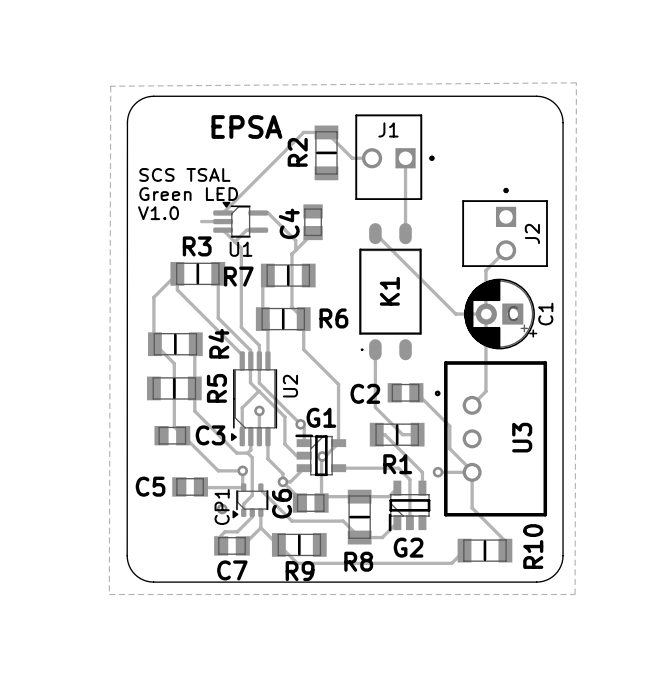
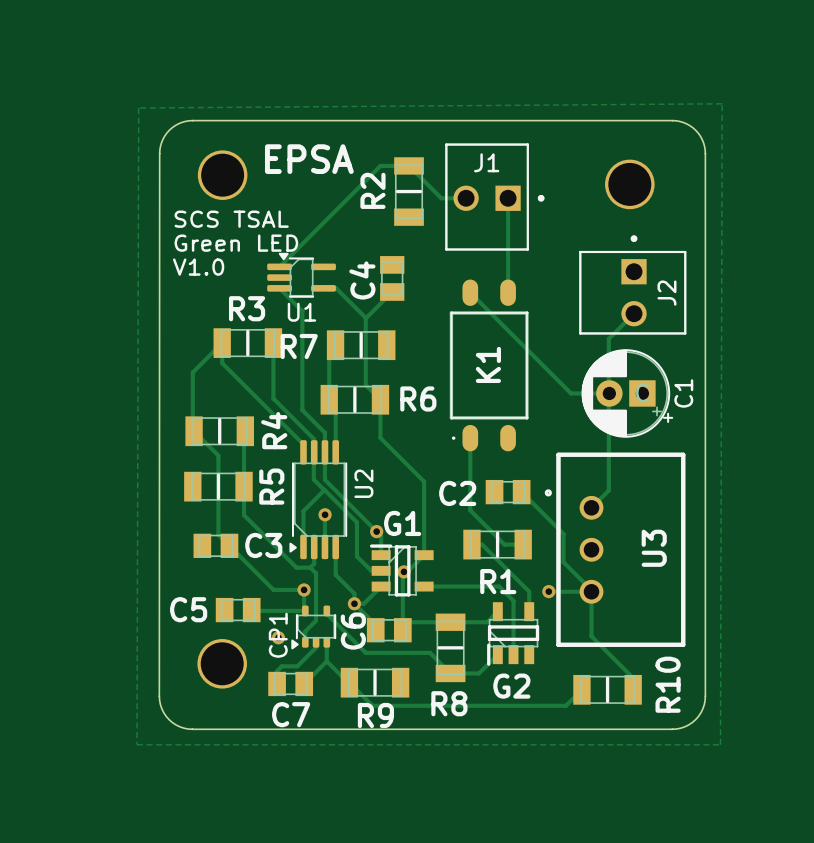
part: none -> (222, 175)
part: none -> (629, 184)
track: (258, 213) (268, 213) (295, 240) (295, 250) -> none
track: (201, 221) (223, 221) -> none
track: (258, 230) (246, 230) (234, 241) -> (323, 288) (336, 288) (365, 317)
part: none -> (222, 663)

